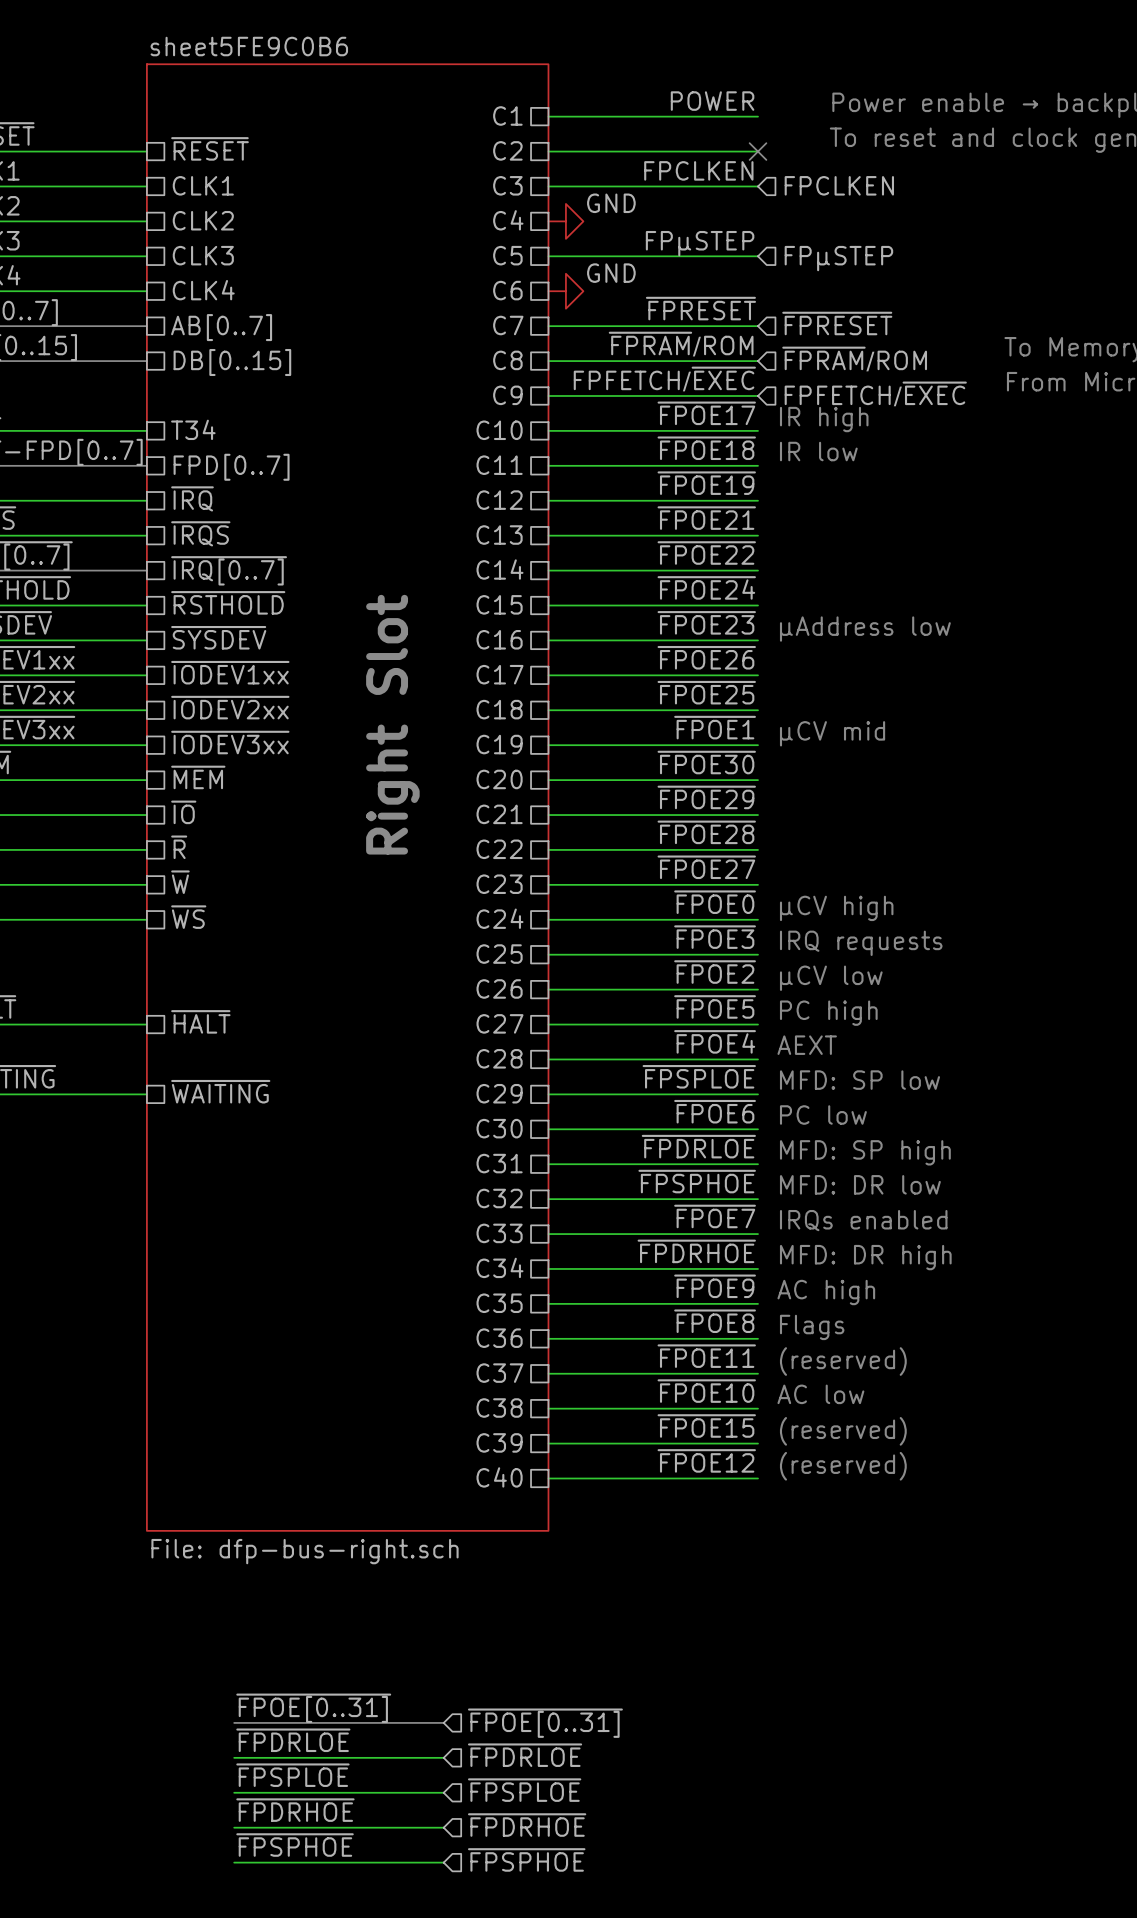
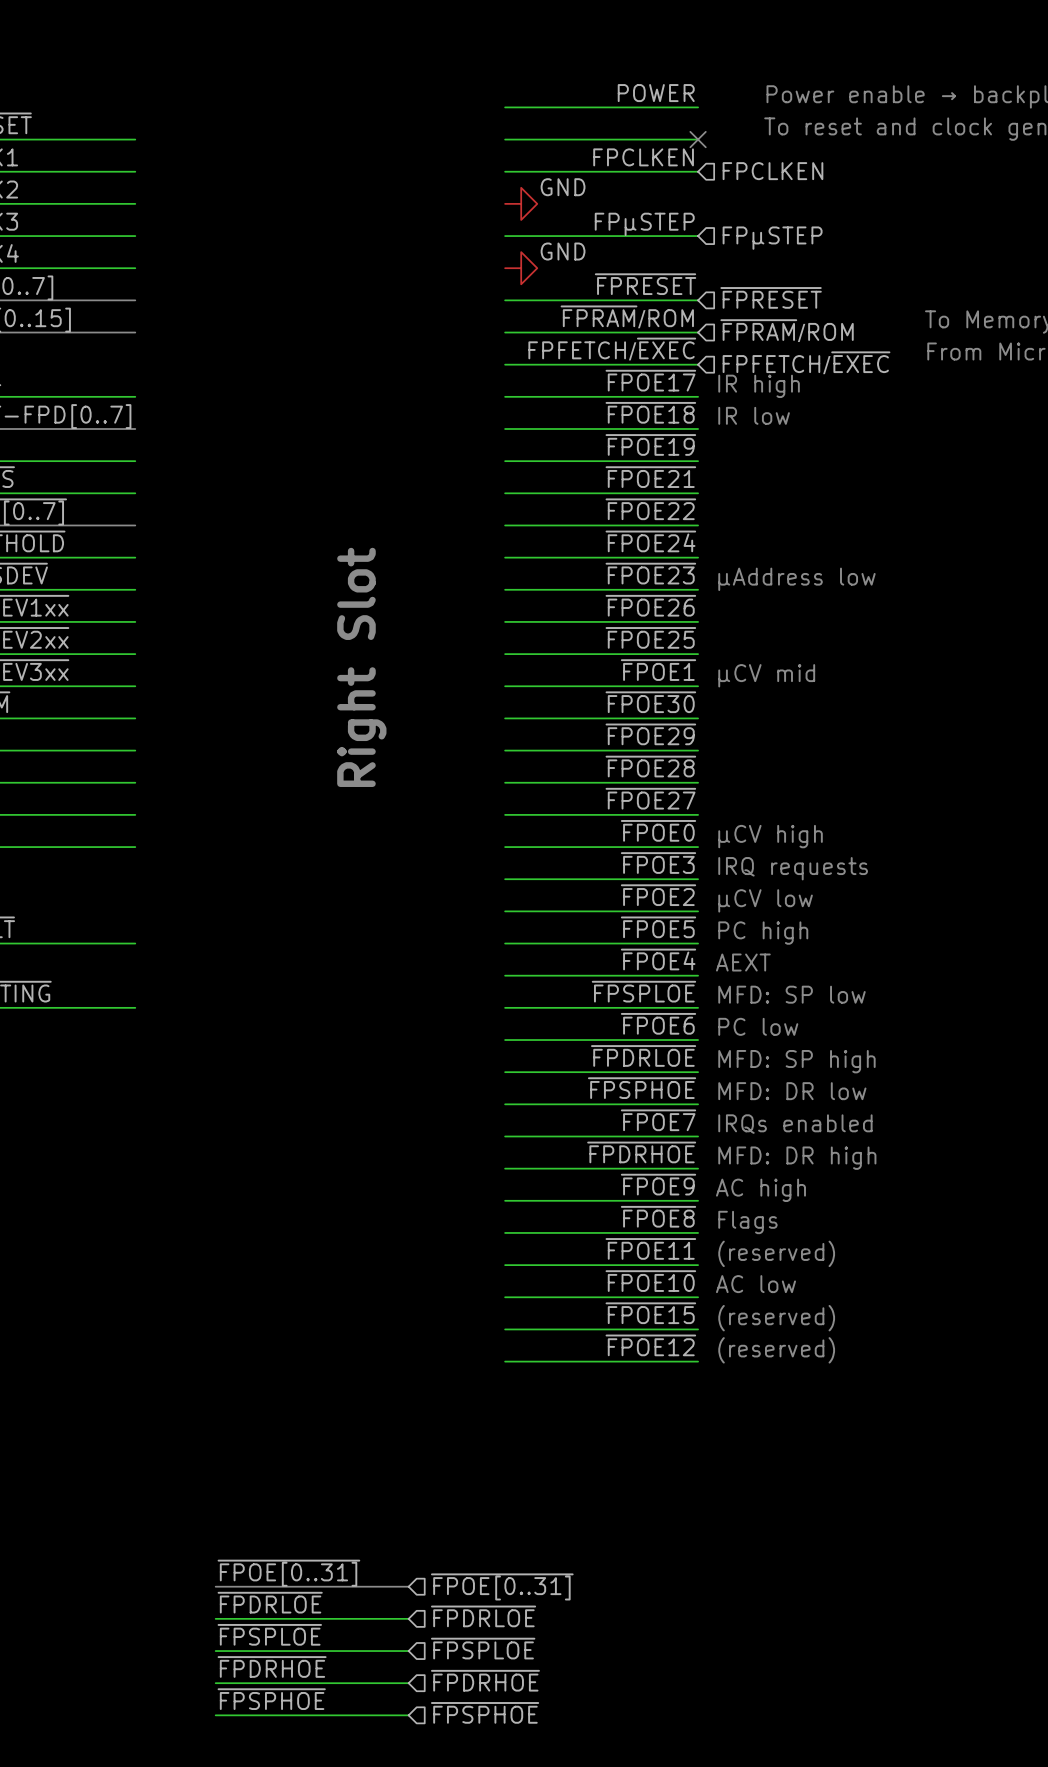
sheet pin: C1 (507, 115) -> none
sheet pin: ~{RESET} (209, 148) -> none
sheet pin: C2 (507, 150) -> none
sheet pin: CLK1 (203, 185) -> none
sheet pin: C3 (507, 185) -> none
sheet pin: CLK2 (203, 220) -> none
sheet pin: C4 (508, 220) -> none
sheet pin: CLK3 (203, 255) -> none
sheet pin: C5 (507, 255) -> none
sheet pin: CLK4 (203, 290) -> none
sheet pin: C6 (507, 290) -> none
sheet pin: C7 (508, 325) -> none
sheet pin: AB[0..7] (221, 327) -> none
sheet pin: C8 (507, 360) -> none
sheet pin: DB[0..15] (232, 362) -> none
sheet pin: C9 (507, 395) -> none
sheet pin: T34 (193, 429) -> none
sheet pin: C10 (499, 430) -> none
sheet pin: C11 (499, 465) -> none
sheet pin: FPD[0..7] (231, 467) -> none
sheet pin: ~{IRQ} (192, 498) -> none
sheet pin: C12 (499, 500) -> none
sheet pin: ~{IRQS} (200, 533) -> none
sheet pin: C13 (499, 535) -> none
sheet pin: C14 (499, 569) -> none
sheet pin: ~{IRQ[0..7]} (229, 570) -> none
sheet pin: ~{RSTHOLD} (228, 602) -> none
sheet pin: C15 (499, 604) -> none
sheet pin: ~{SYSDEV} (218, 637) -> none
sheet pin: C16 (499, 639) -> none
sheet pin: ~{IODEV1xx} (230, 672) -> none
sheet pin: C17 (499, 674) -> none
sheet pin: ~{IODEV2xx} (230, 707) -> none
sheet pin: C18 (499, 709) -> none
sheet pin: ~{IODEV3xx} (230, 742) -> none
sheet pin: C19 (499, 744) -> none
sheet pin: ~{MEM} (198, 777) -> none
sheet pin: C20 (499, 779) -> none
sheet sheet5FE9C0B6: File: dfp-bus-right.sch (347, 797) -> none
sheet pin: ~{IO} (183, 812) -> none
sheet pin: C21 (499, 814) -> none
sheet pin: ~{R} (179, 847) -> none
sheet pin: C22 (499, 849) -> none
sheet pin: ~{W} (180, 882) -> none
sheet pin: C23 (499, 884) -> none
sheet pin: ~{WS} (188, 917) -> none
sheet pin: C24 (499, 918) -> none
sheet pin: C25 (499, 954) -> none
sheet pin: C26 (499, 988) -> none
sheet pin: ~{HALT} (200, 1021) -> none
sheet pin: C27 (499, 1023) -> none
sheet pin: C28 (499, 1058) -> none
sheet pin: ~{WAITING} (220, 1091) -> none
sheet pin: C29 (499, 1093) -> none
sheet pin: C30 (499, 1128) -> none
sheet pin: C31 (499, 1163) -> none
sheet pin: C32 (499, 1198) -> none
sheet pin: C33 (499, 1233) -> none
sheet pin: C34 (499, 1267) -> none
sheet pin: C35 (499, 1303) -> none
sheet pin: C36 (499, 1338) -> none
sheet pin: C37 (499, 1373) -> none
sheet pin: C38 (499, 1408) -> none
sheet pin: C39 (499, 1442) -> none
sheet pin: C40 (499, 1477) -> none

